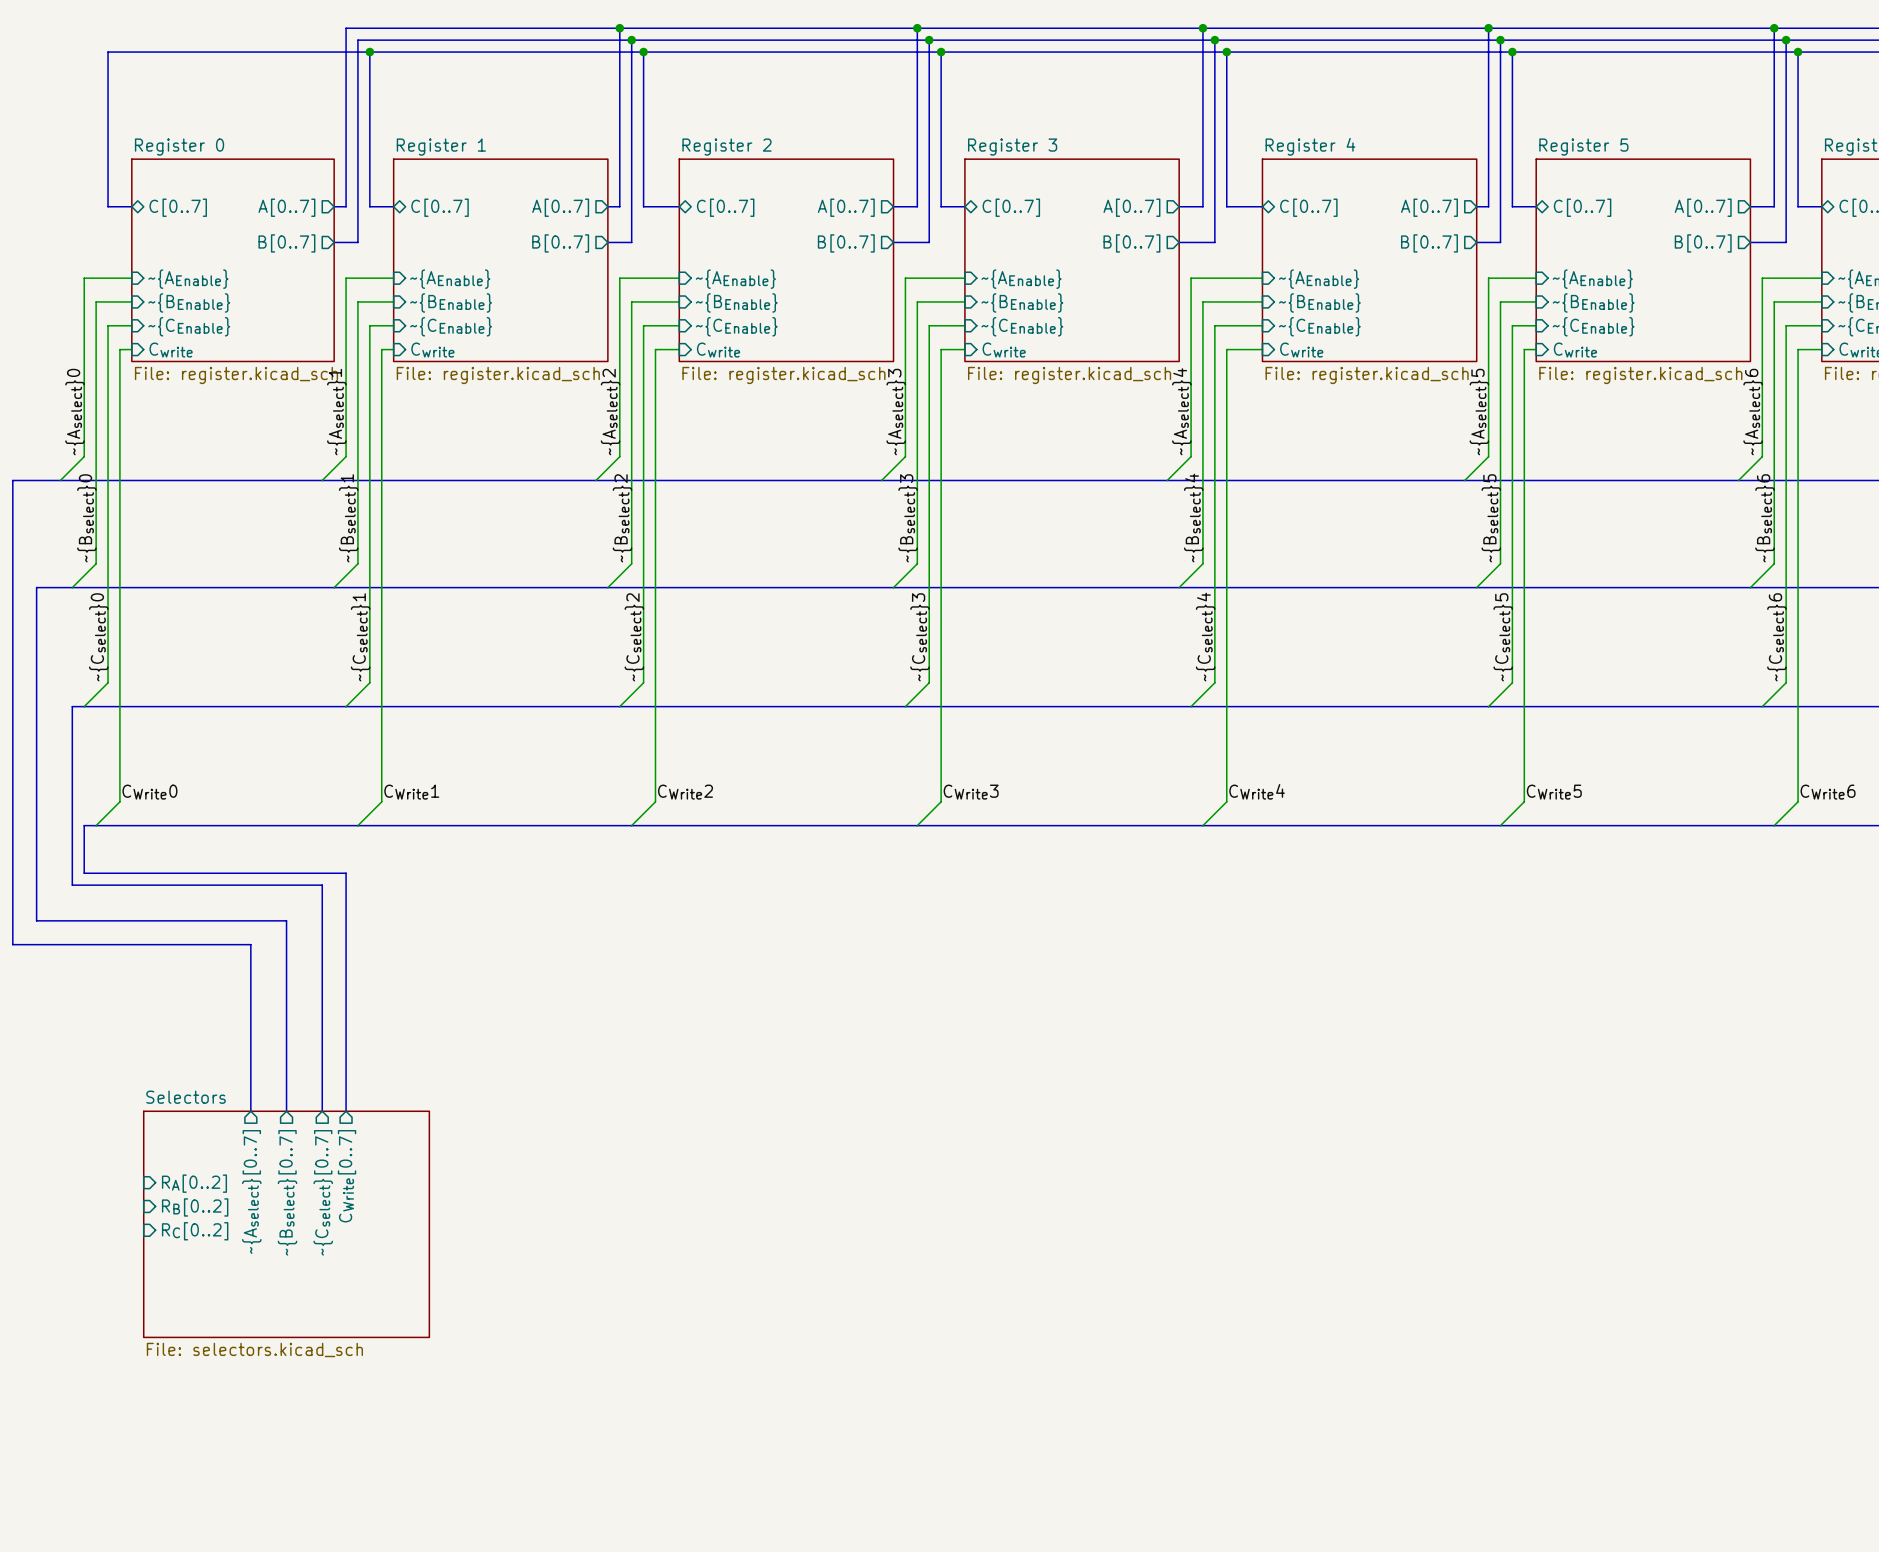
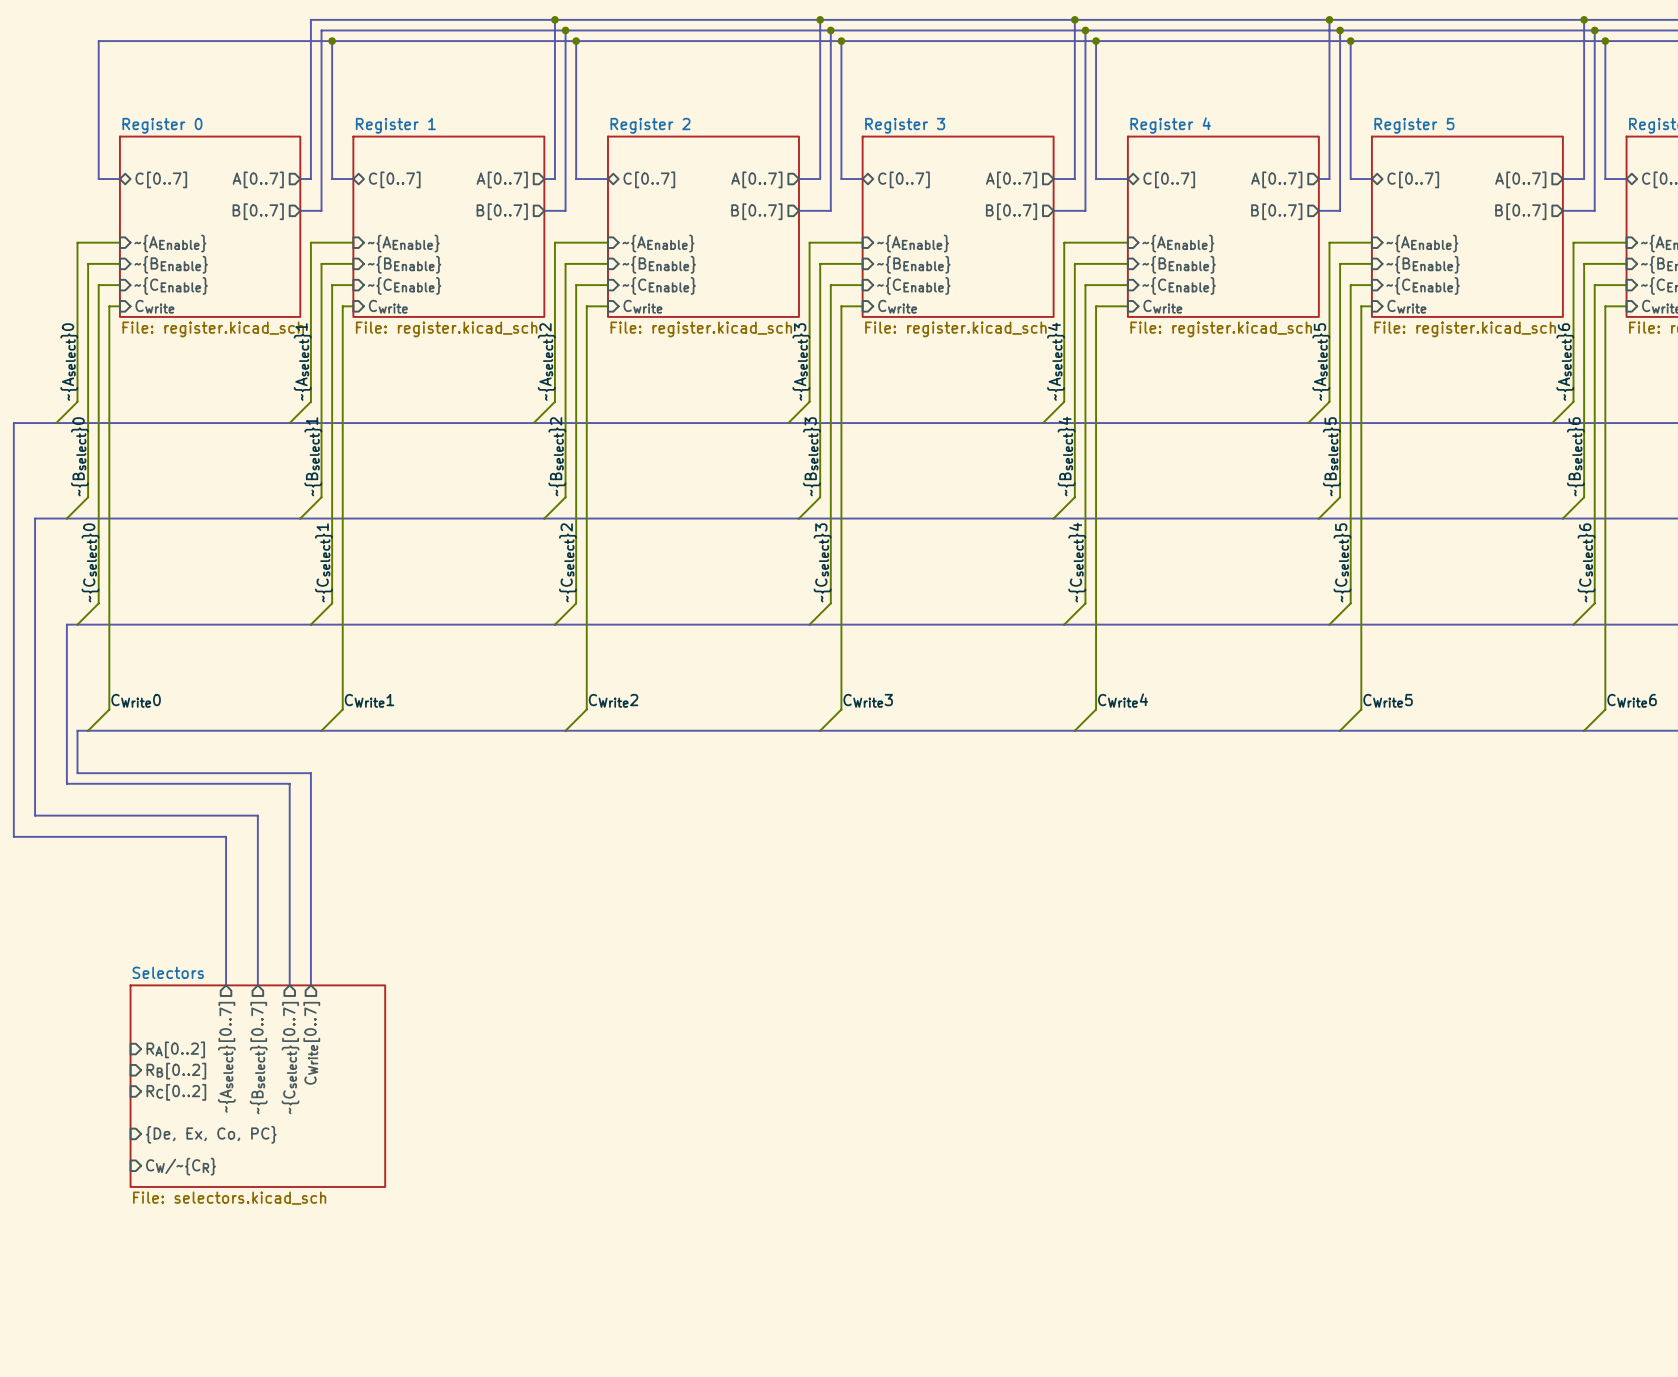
sheet pin: none -> {De, Ex, Co, PC} (211, 1134)
sheet pin: none -> CW/~{CR} (180, 1166)

